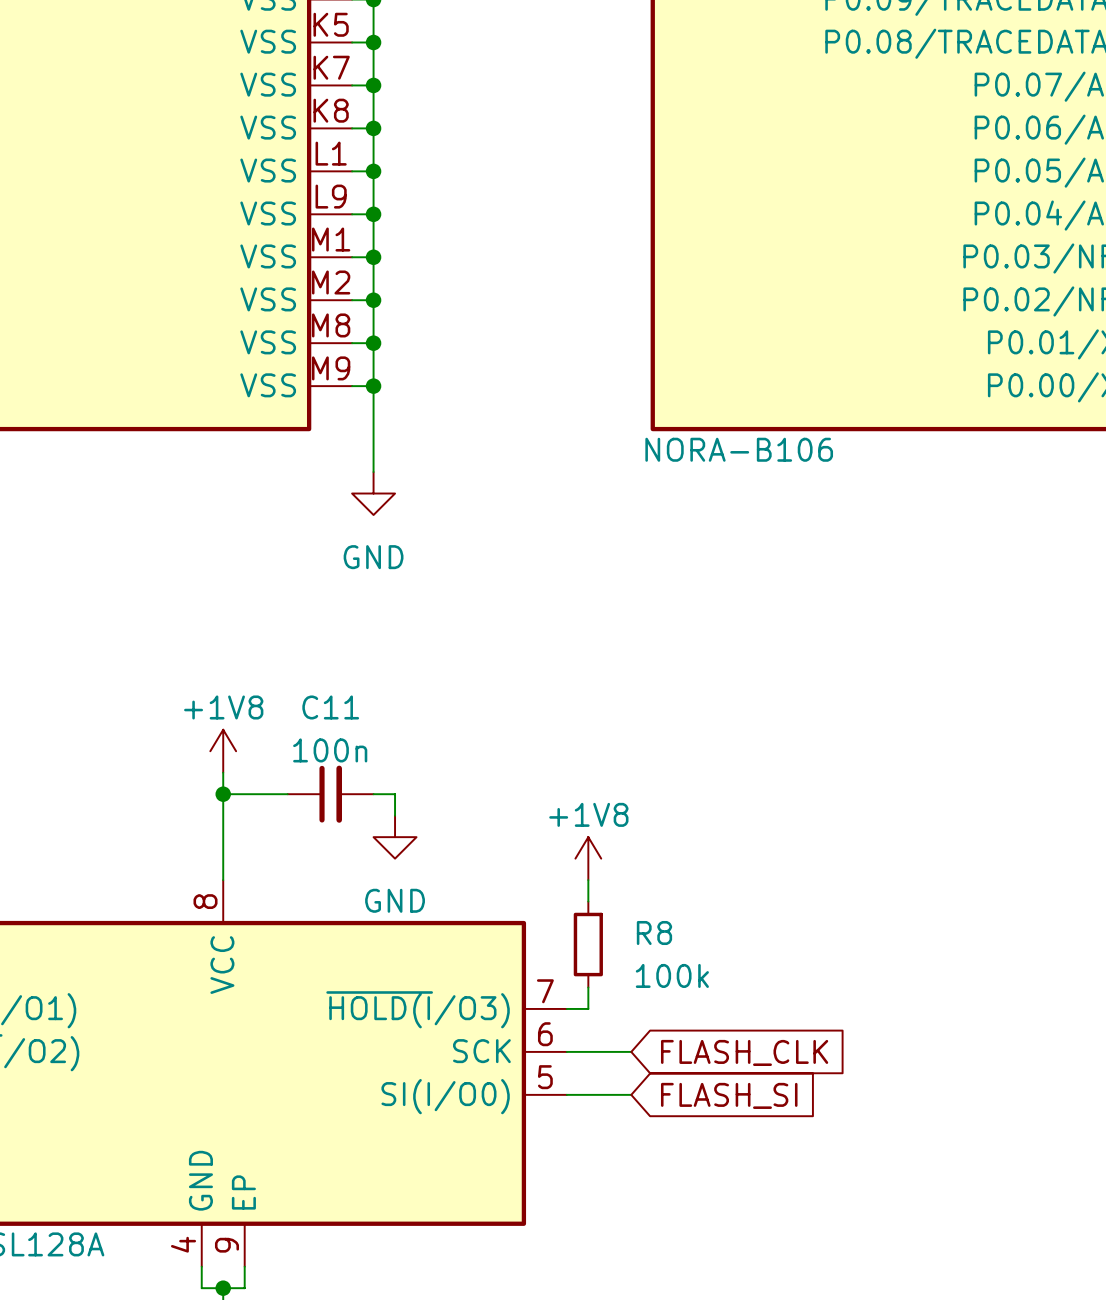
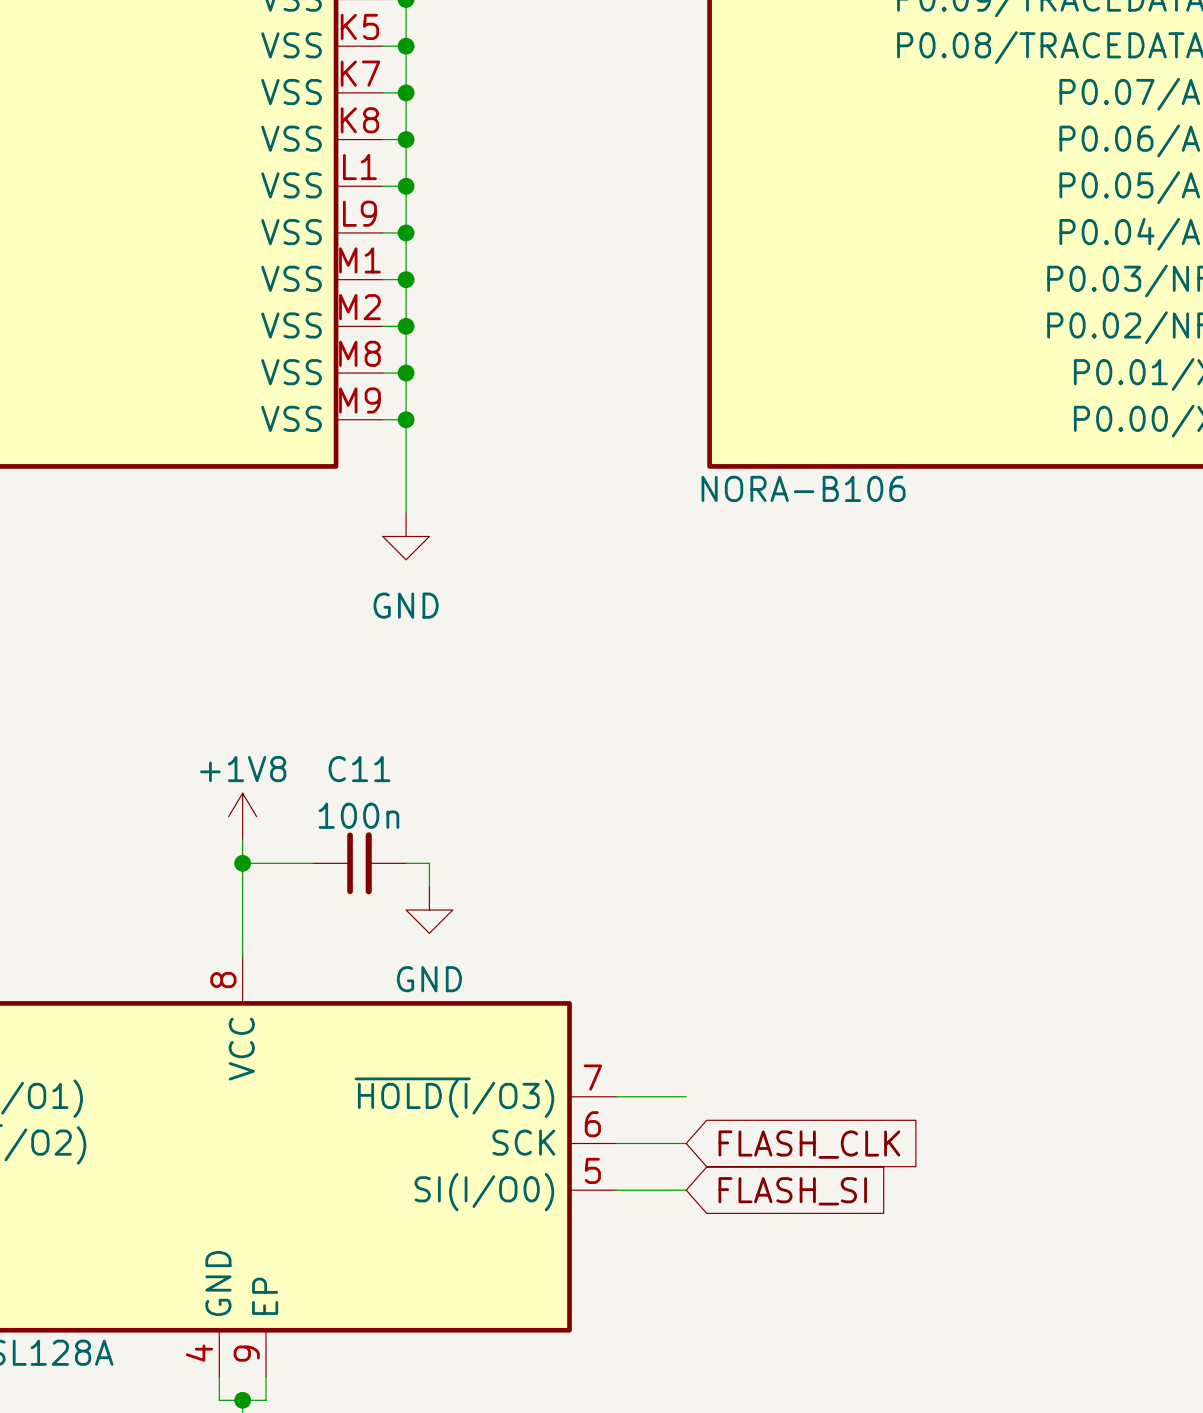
power symbol: +1V8 (588, 858) -> none
wire: (588, 880) (588, 901) -> none
R8: 100k (588, 944) -> none
wire: (588, 987) (588, 1008) -> (686, 1096) (639, 1096)

